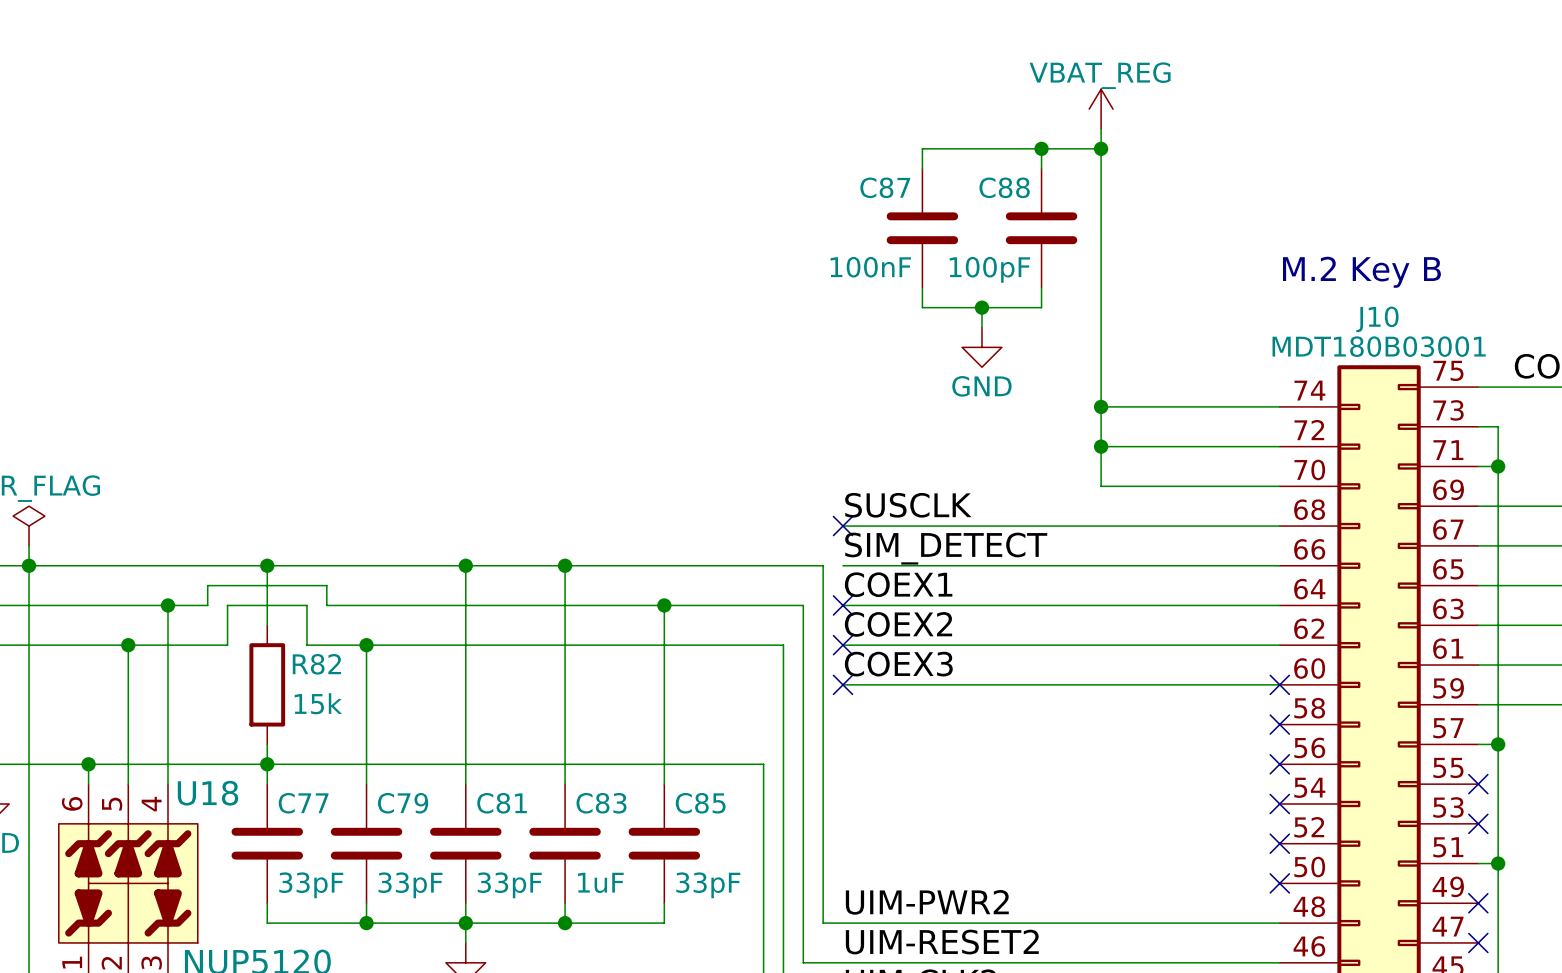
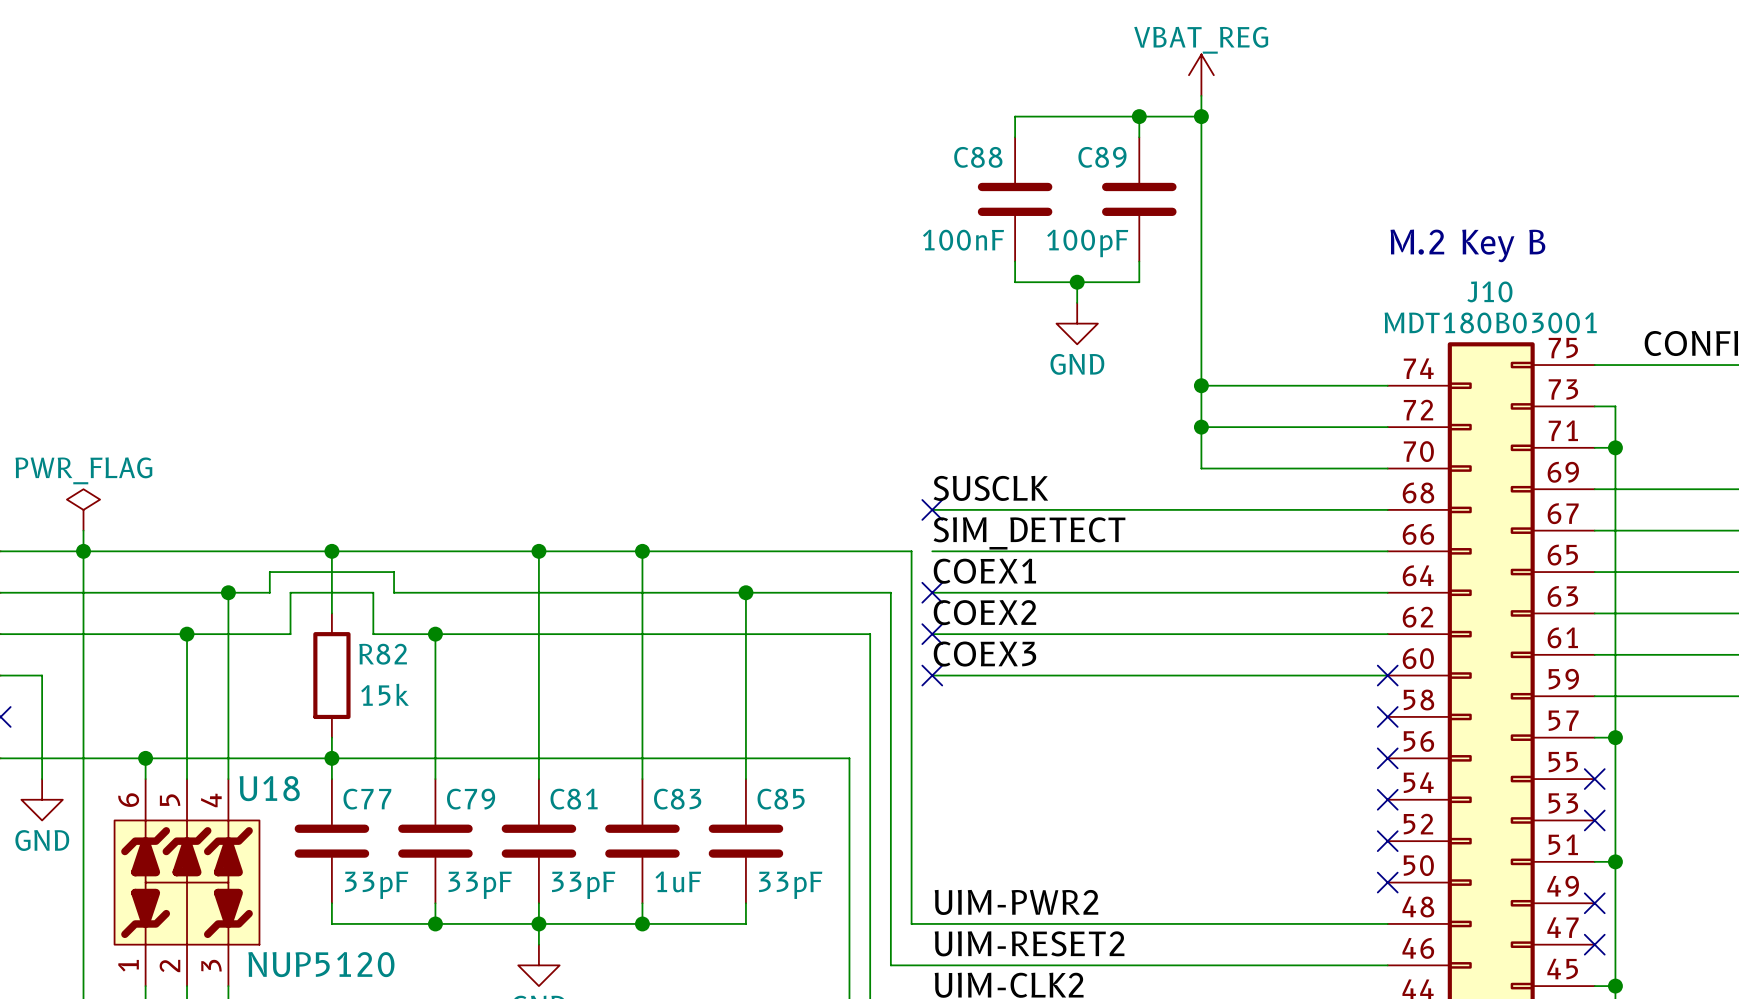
C87 name: C87 (885, 187) -> C88 (978, 157)
C88 name: C88 (1004, 187) -> C89 (1102, 157)

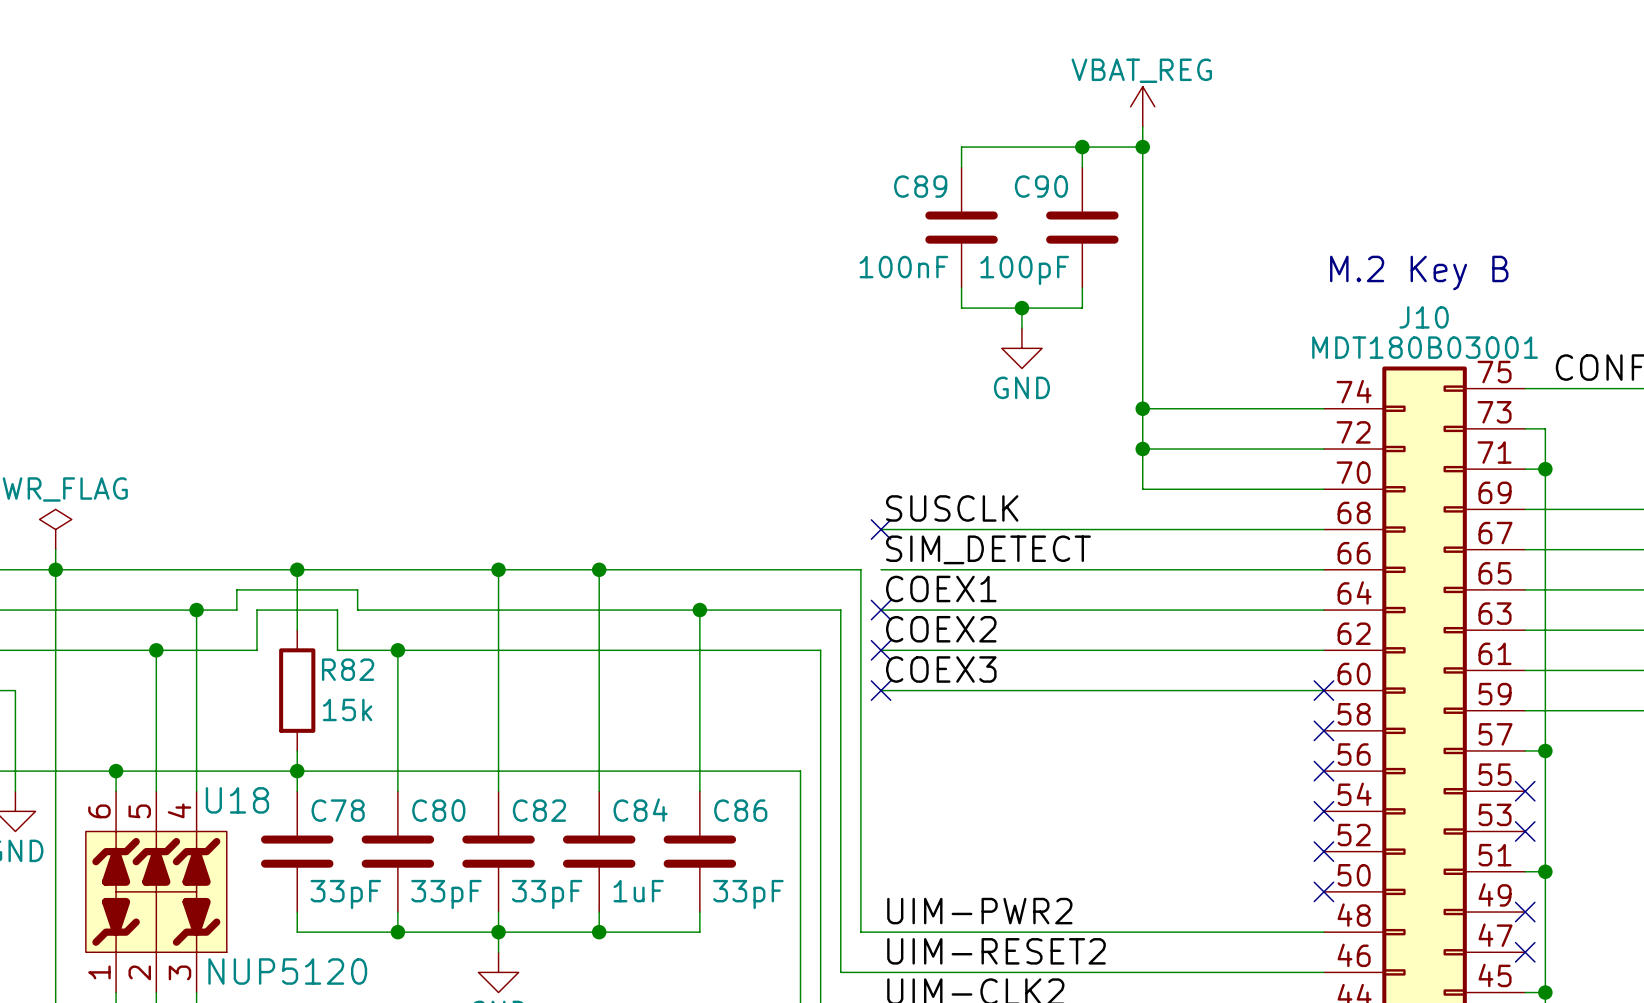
C88 name: C88 (978, 157) -> C89 (920, 186)
C89 name: C89 (1102, 157) -> C90 (1041, 186)
C77 name: C77 (367, 799) -> C78 (338, 810)
C79 name: C79 (471, 799) -> C80 (438, 810)
C81 name: C81 (574, 799) -> C82 (539, 810)
C83 name: C83 (677, 799) -> C84 (640, 810)
C85 name: C85 (781, 799) -> C86 (740, 810)

